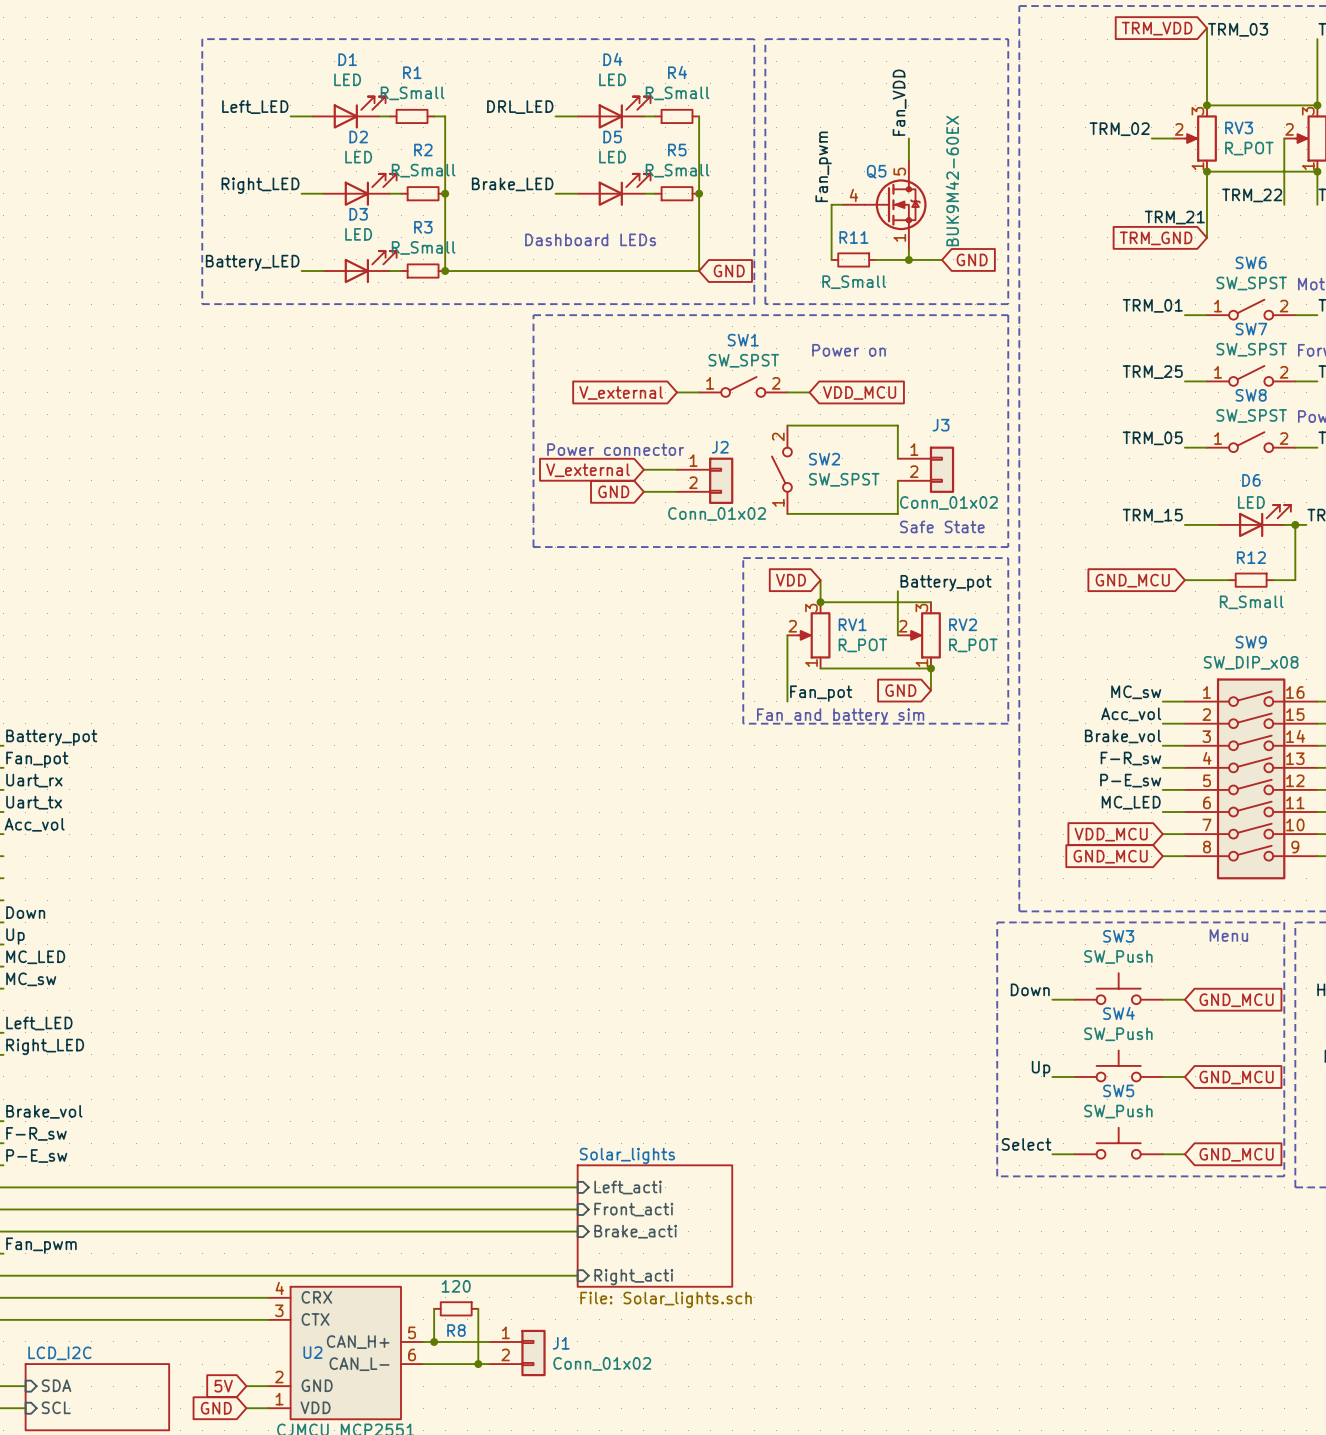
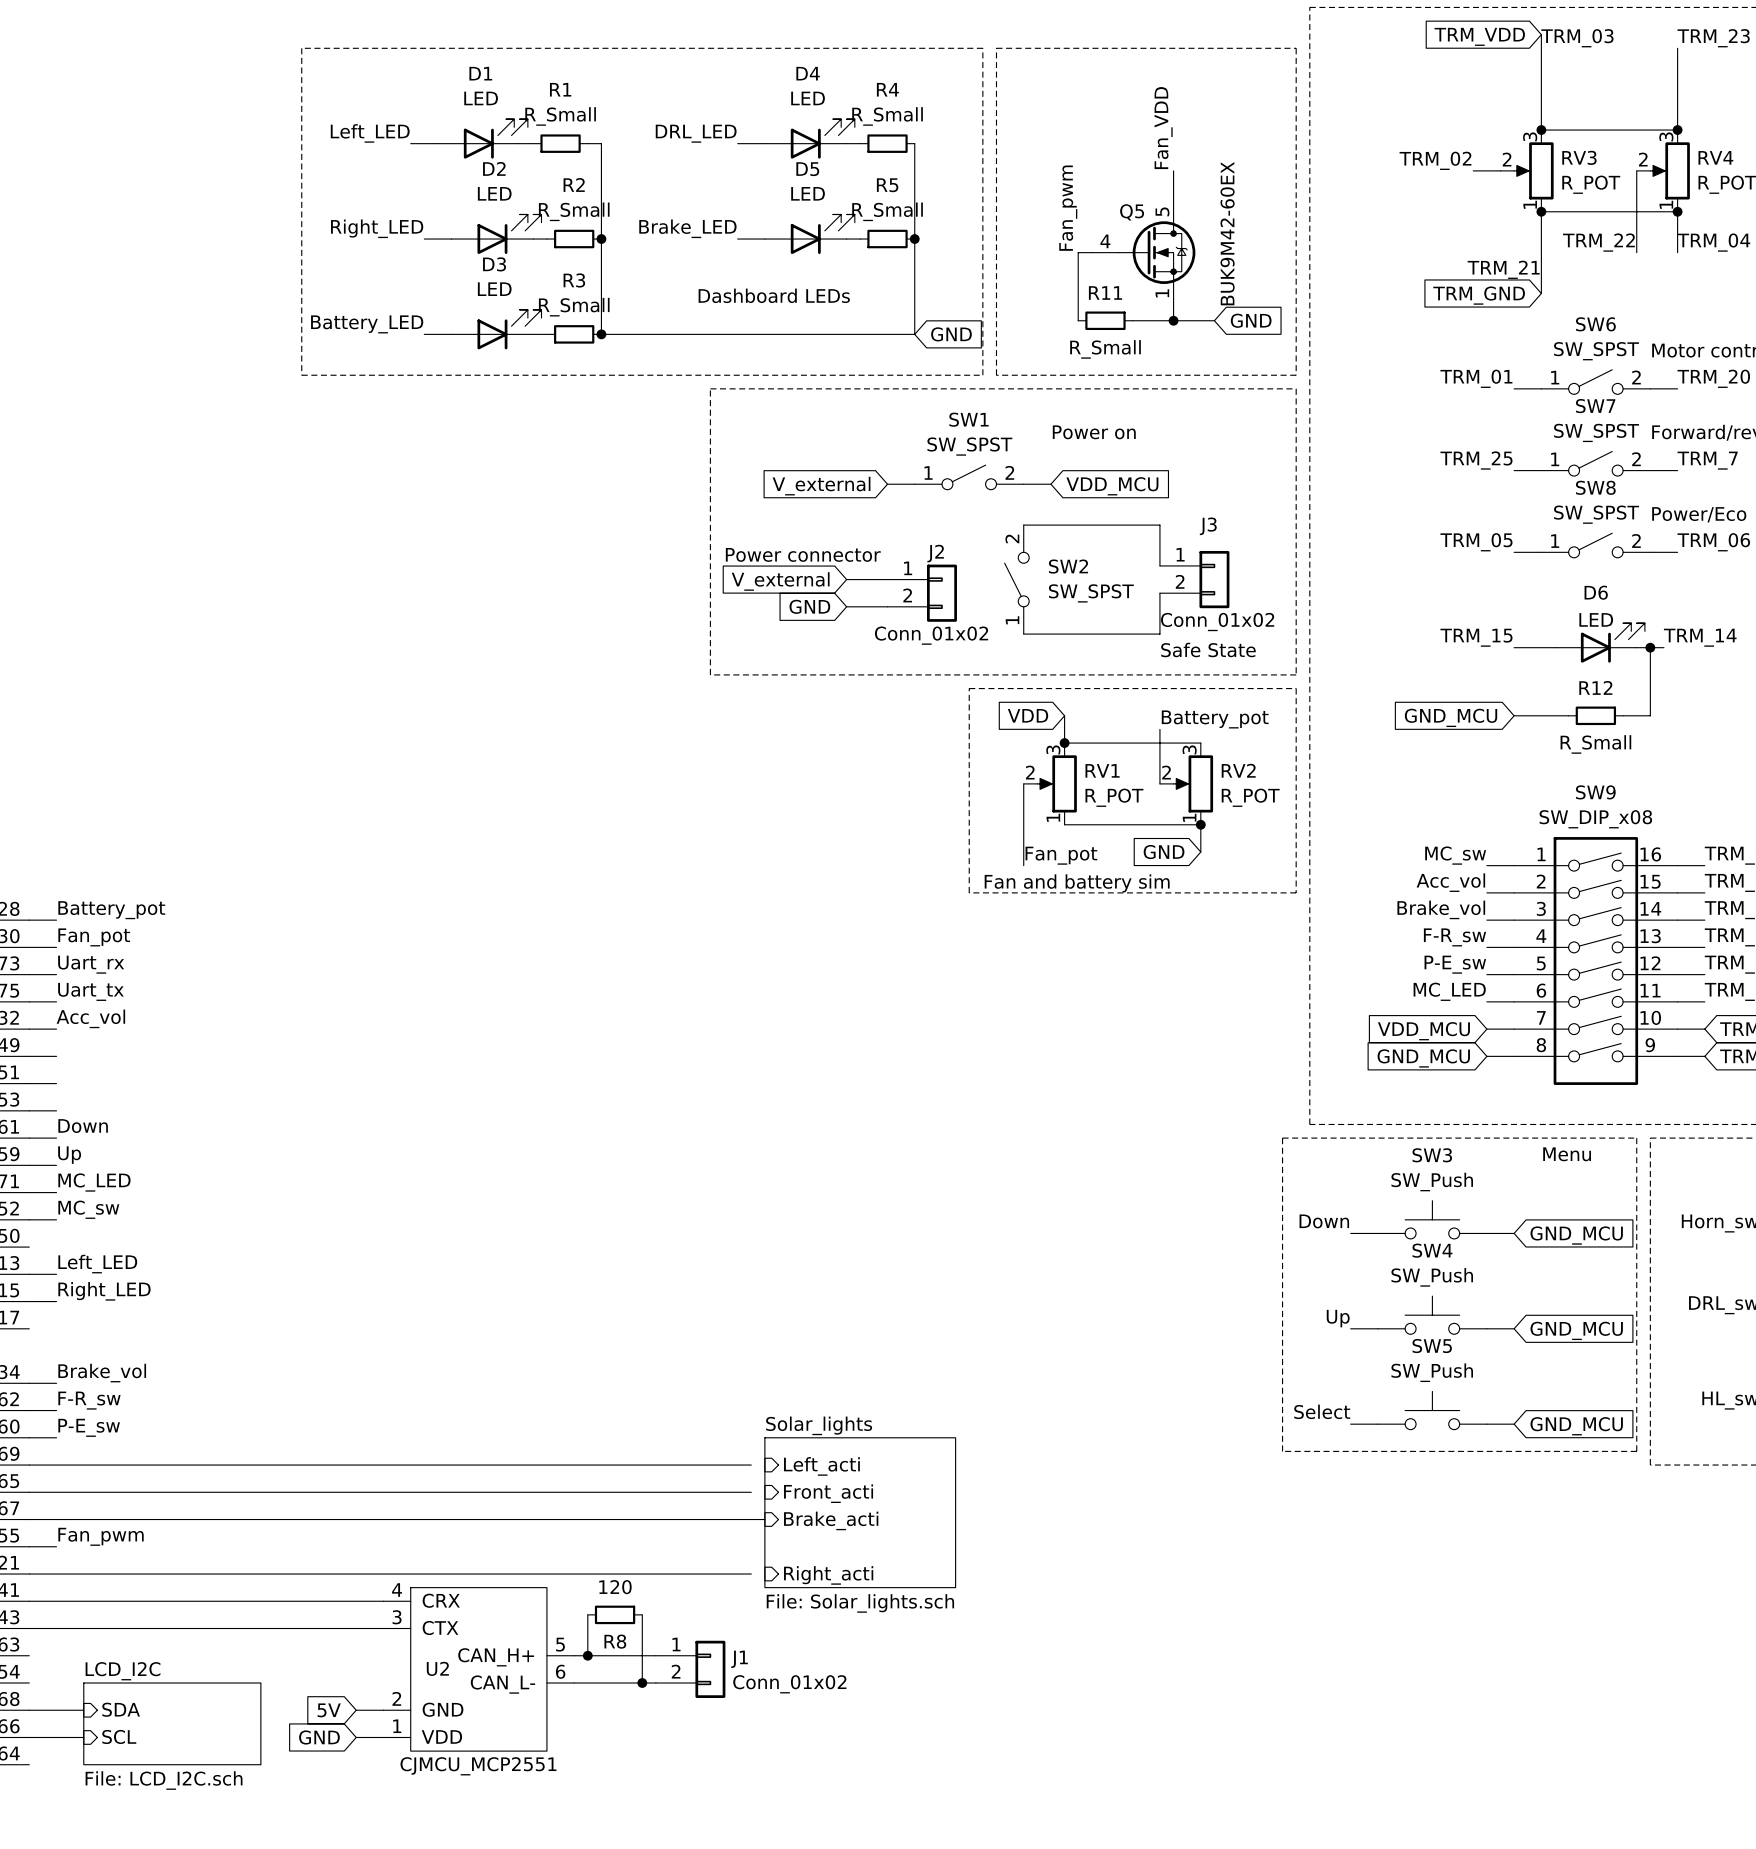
wire: (566, 1187) (577, 1187) -> none
wire: (566, 1209) (577, 1209) -> none
wire: (566, 1275) (577, 1275) -> none

